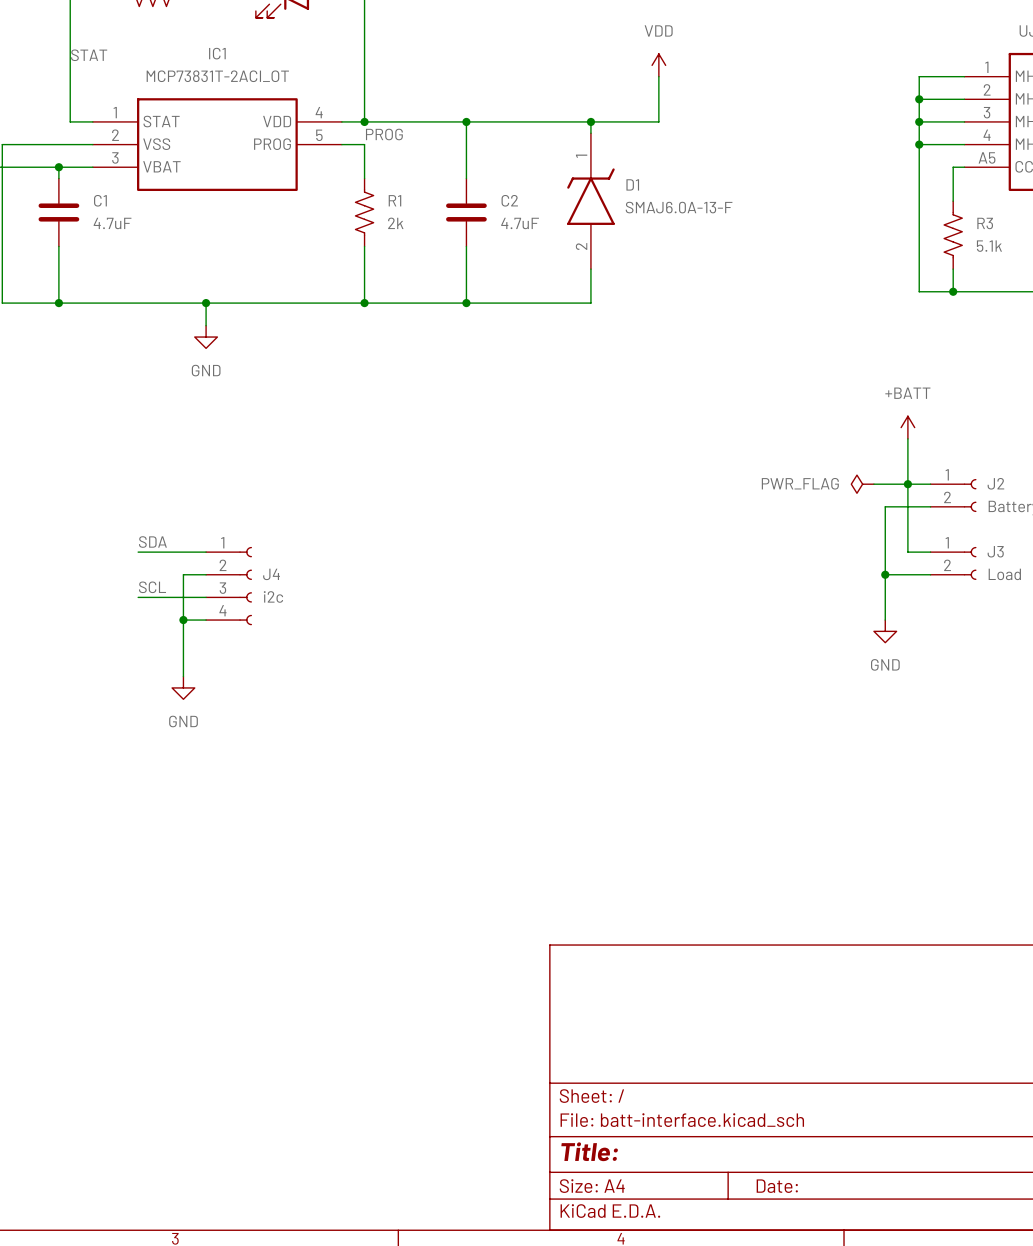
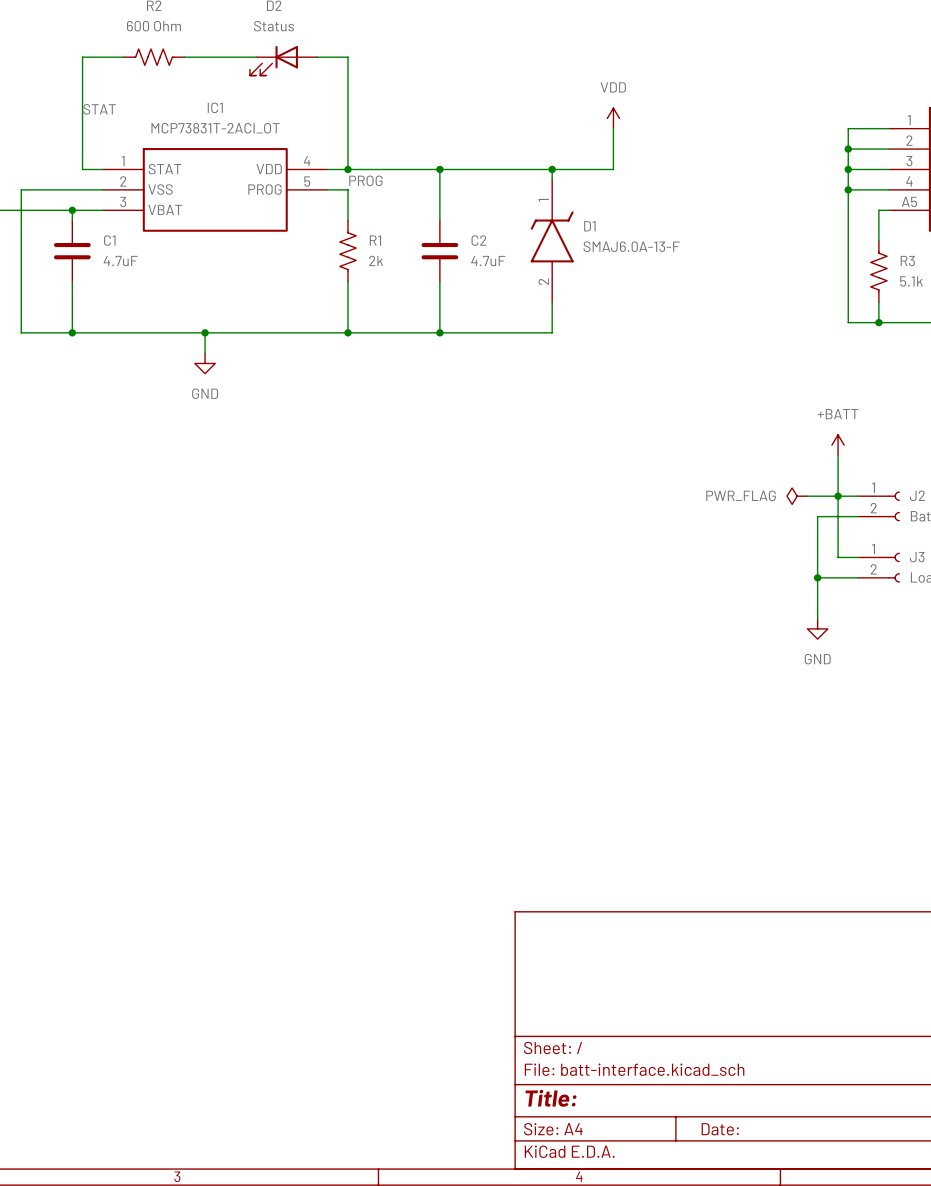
label: SDA (152, 542) -> none
wire: (138, 552) (206, 552) -> none
wire: (206, 574) (183, 574) (183, 676) -> none
J4: i2c (229, 586) -> none
label: SCL (152, 587) -> none
wire: (138, 597) (206, 597) -> none
wire: (183, 620) (206, 620) -> none
junction: (183, 620) -> none
power symbol: GND (183, 687) -> none

